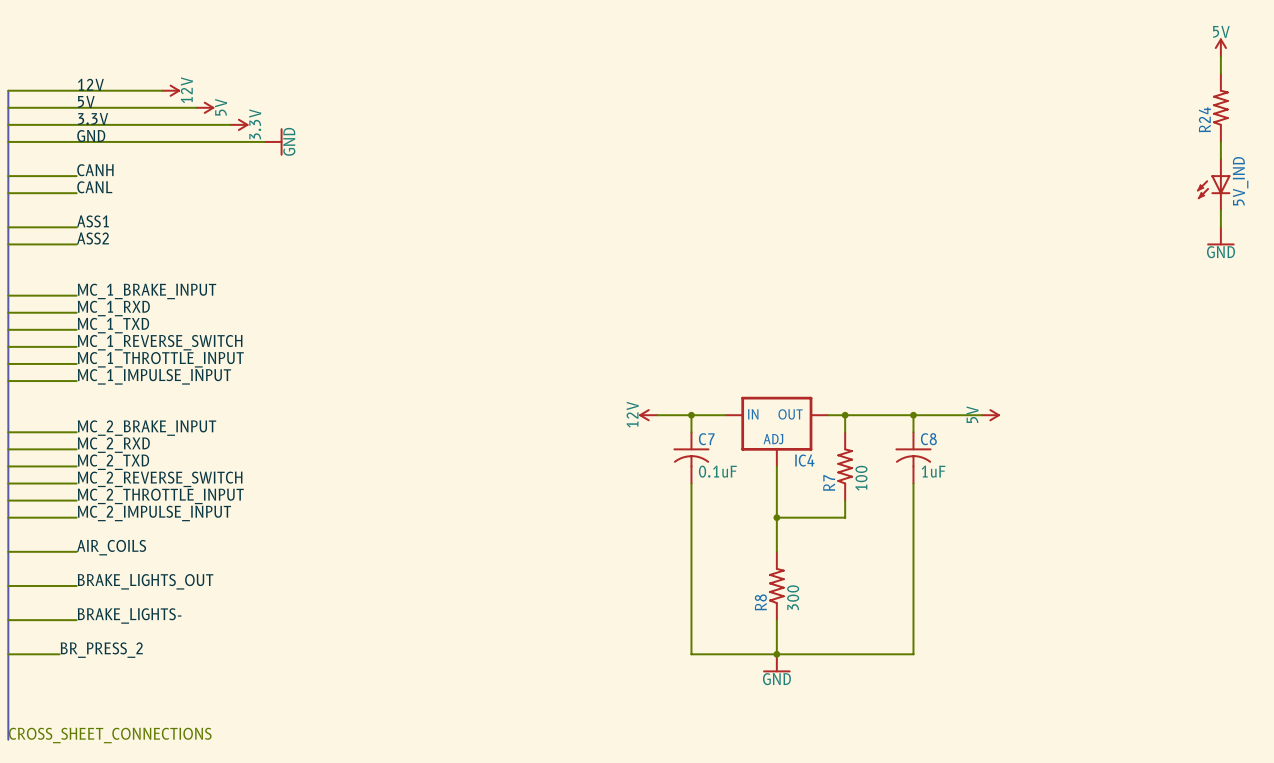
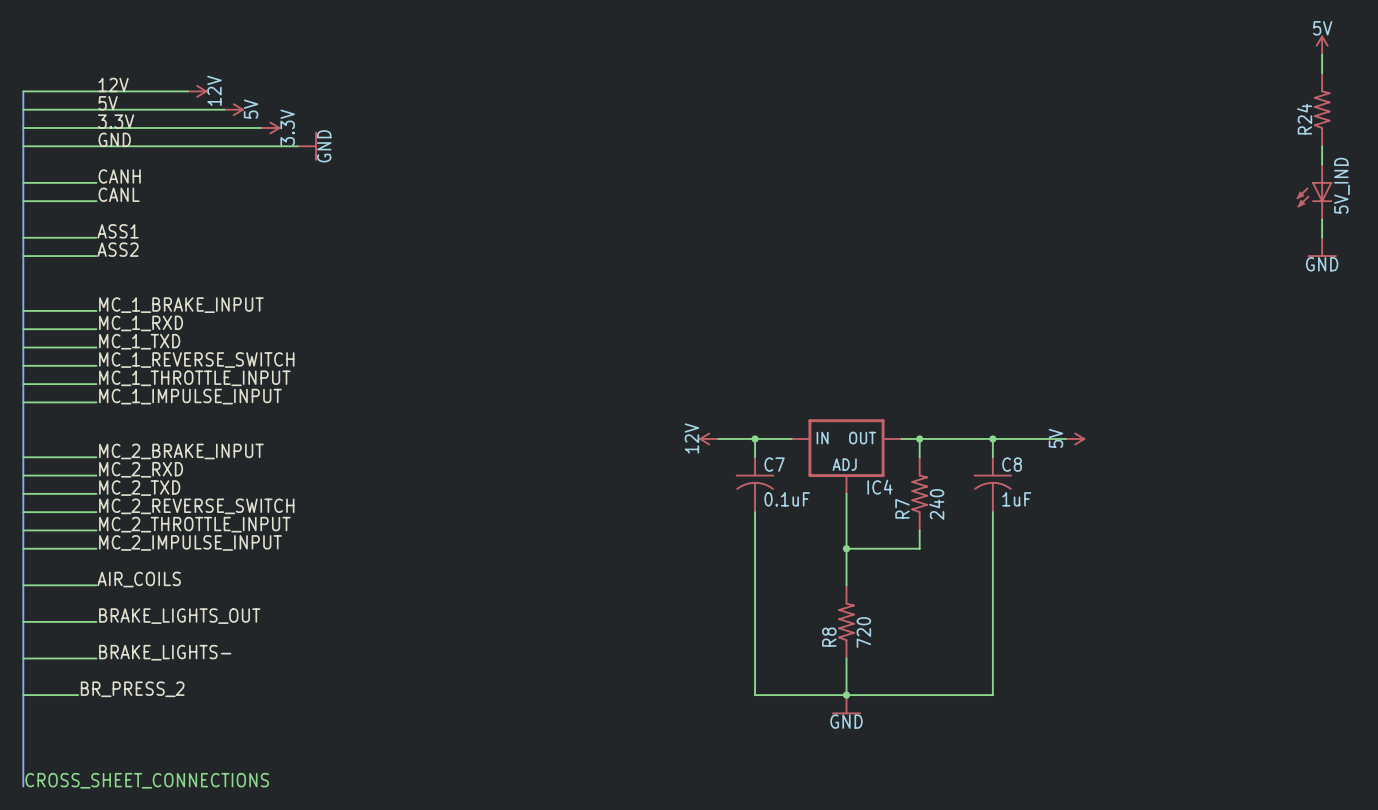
R7 value: 100 (861, 478) -> 240 (936, 504)
R8 value: 300 (793, 597) -> 720 (863, 632)

